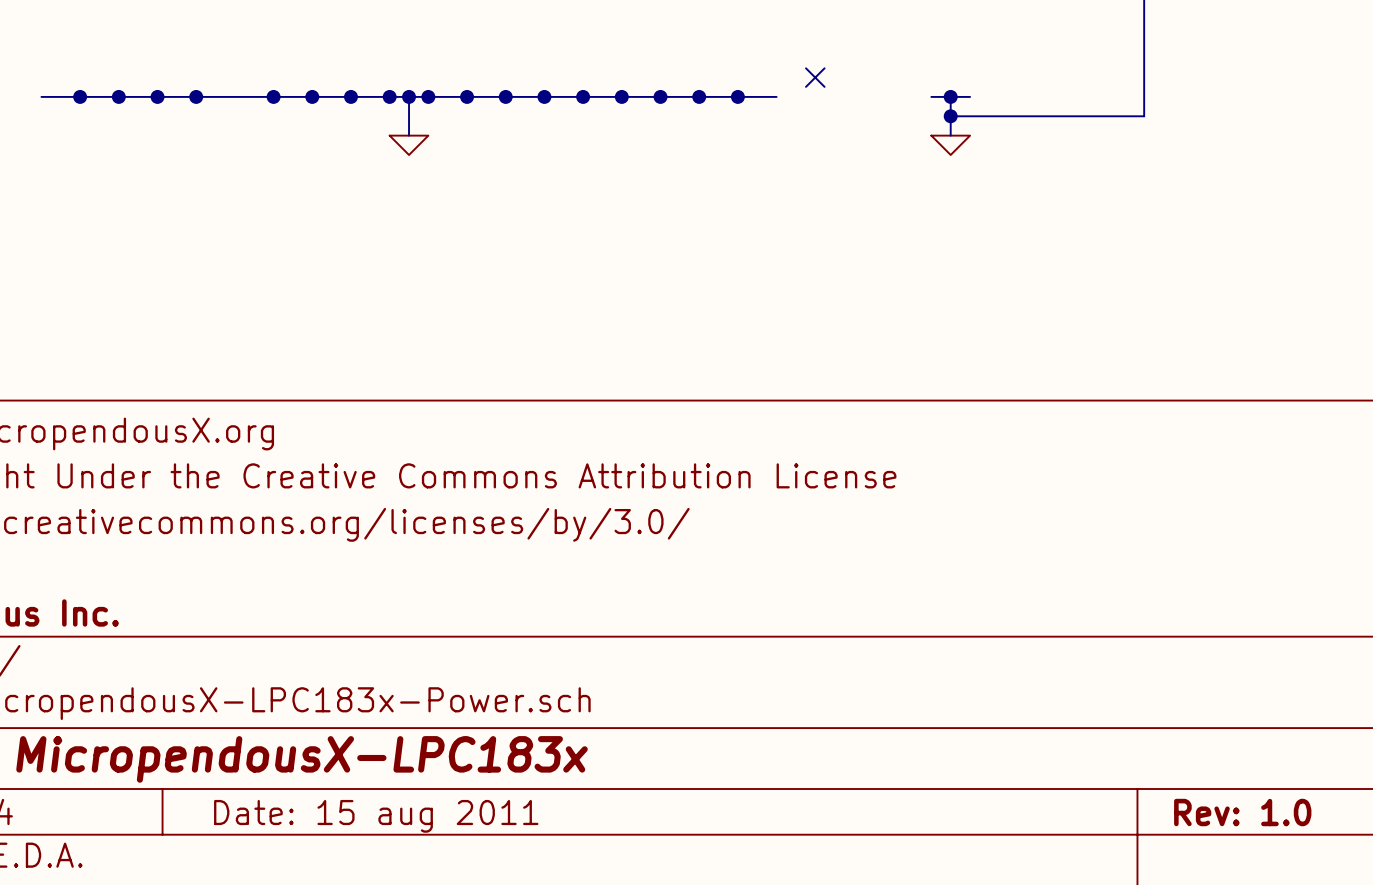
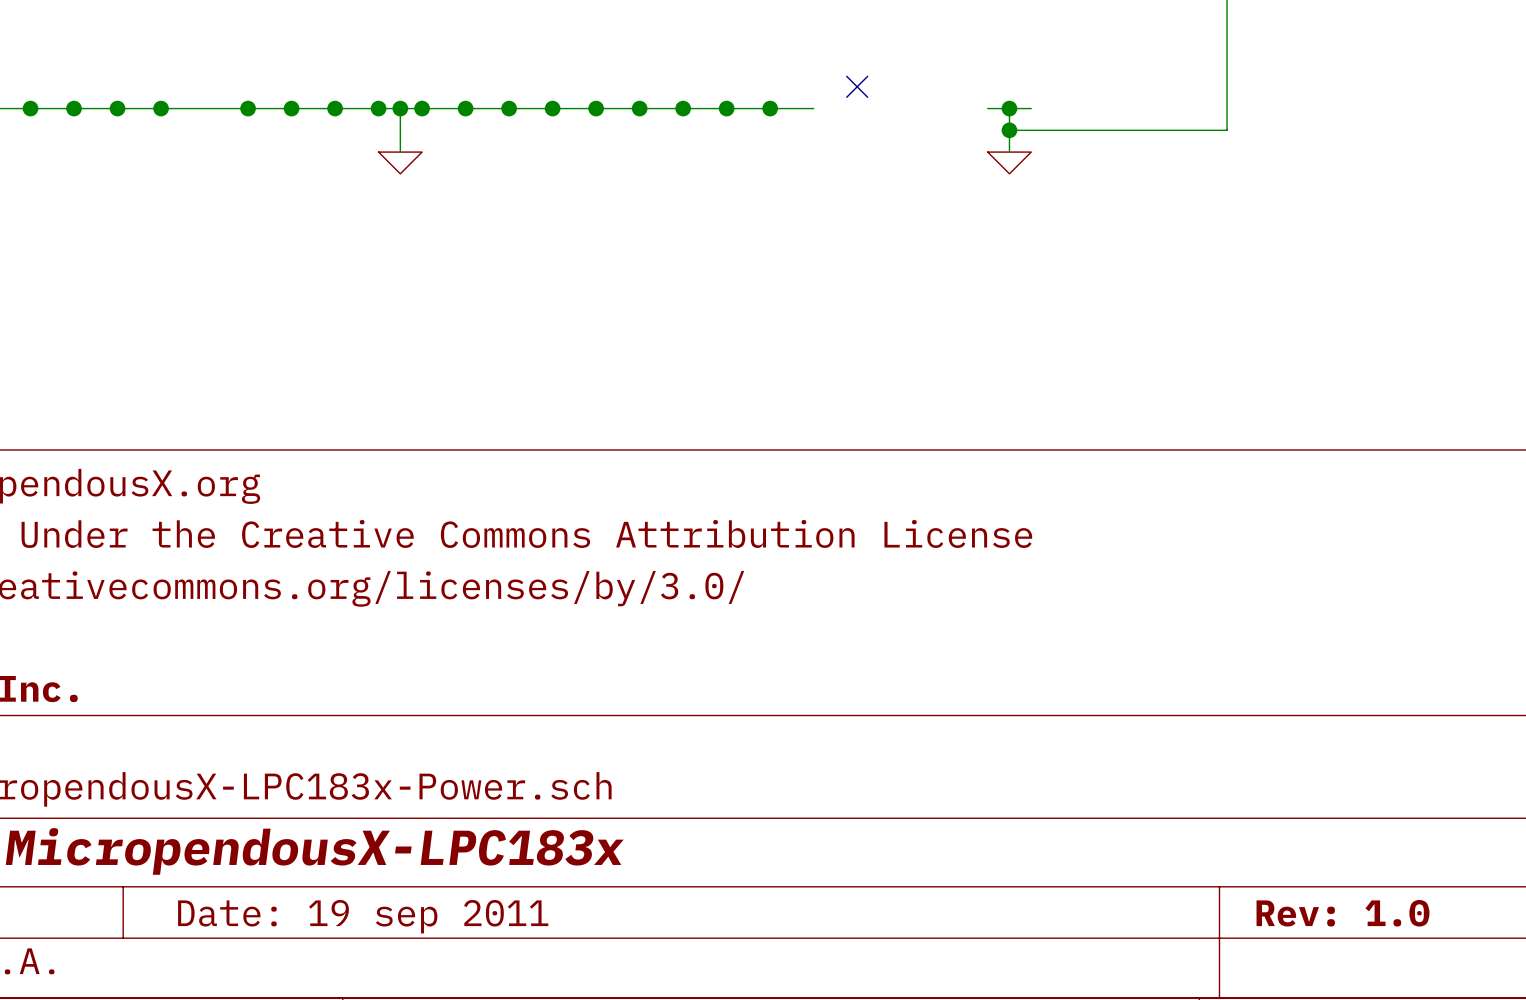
title block: Date: 15 aug 2011 (376, 816) -> Date: 19 sep 2011 (363, 916)

